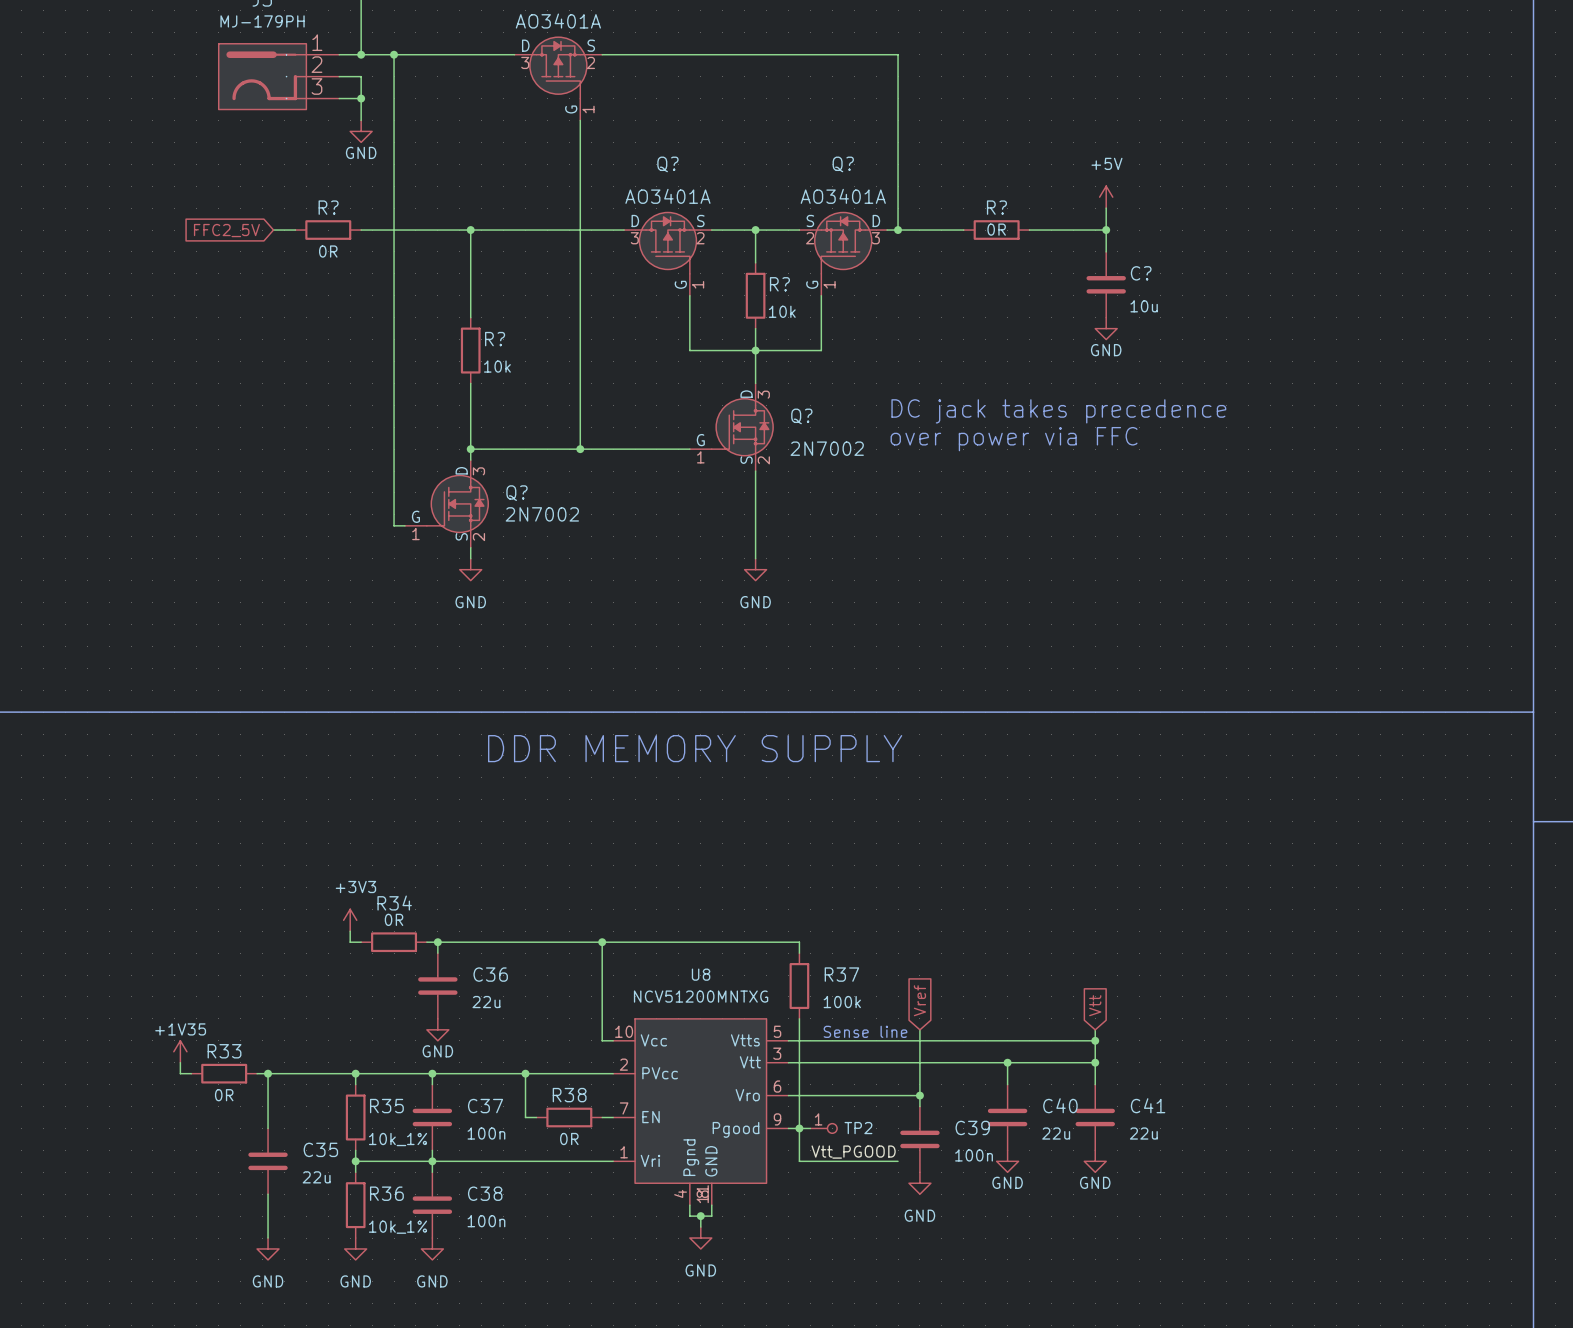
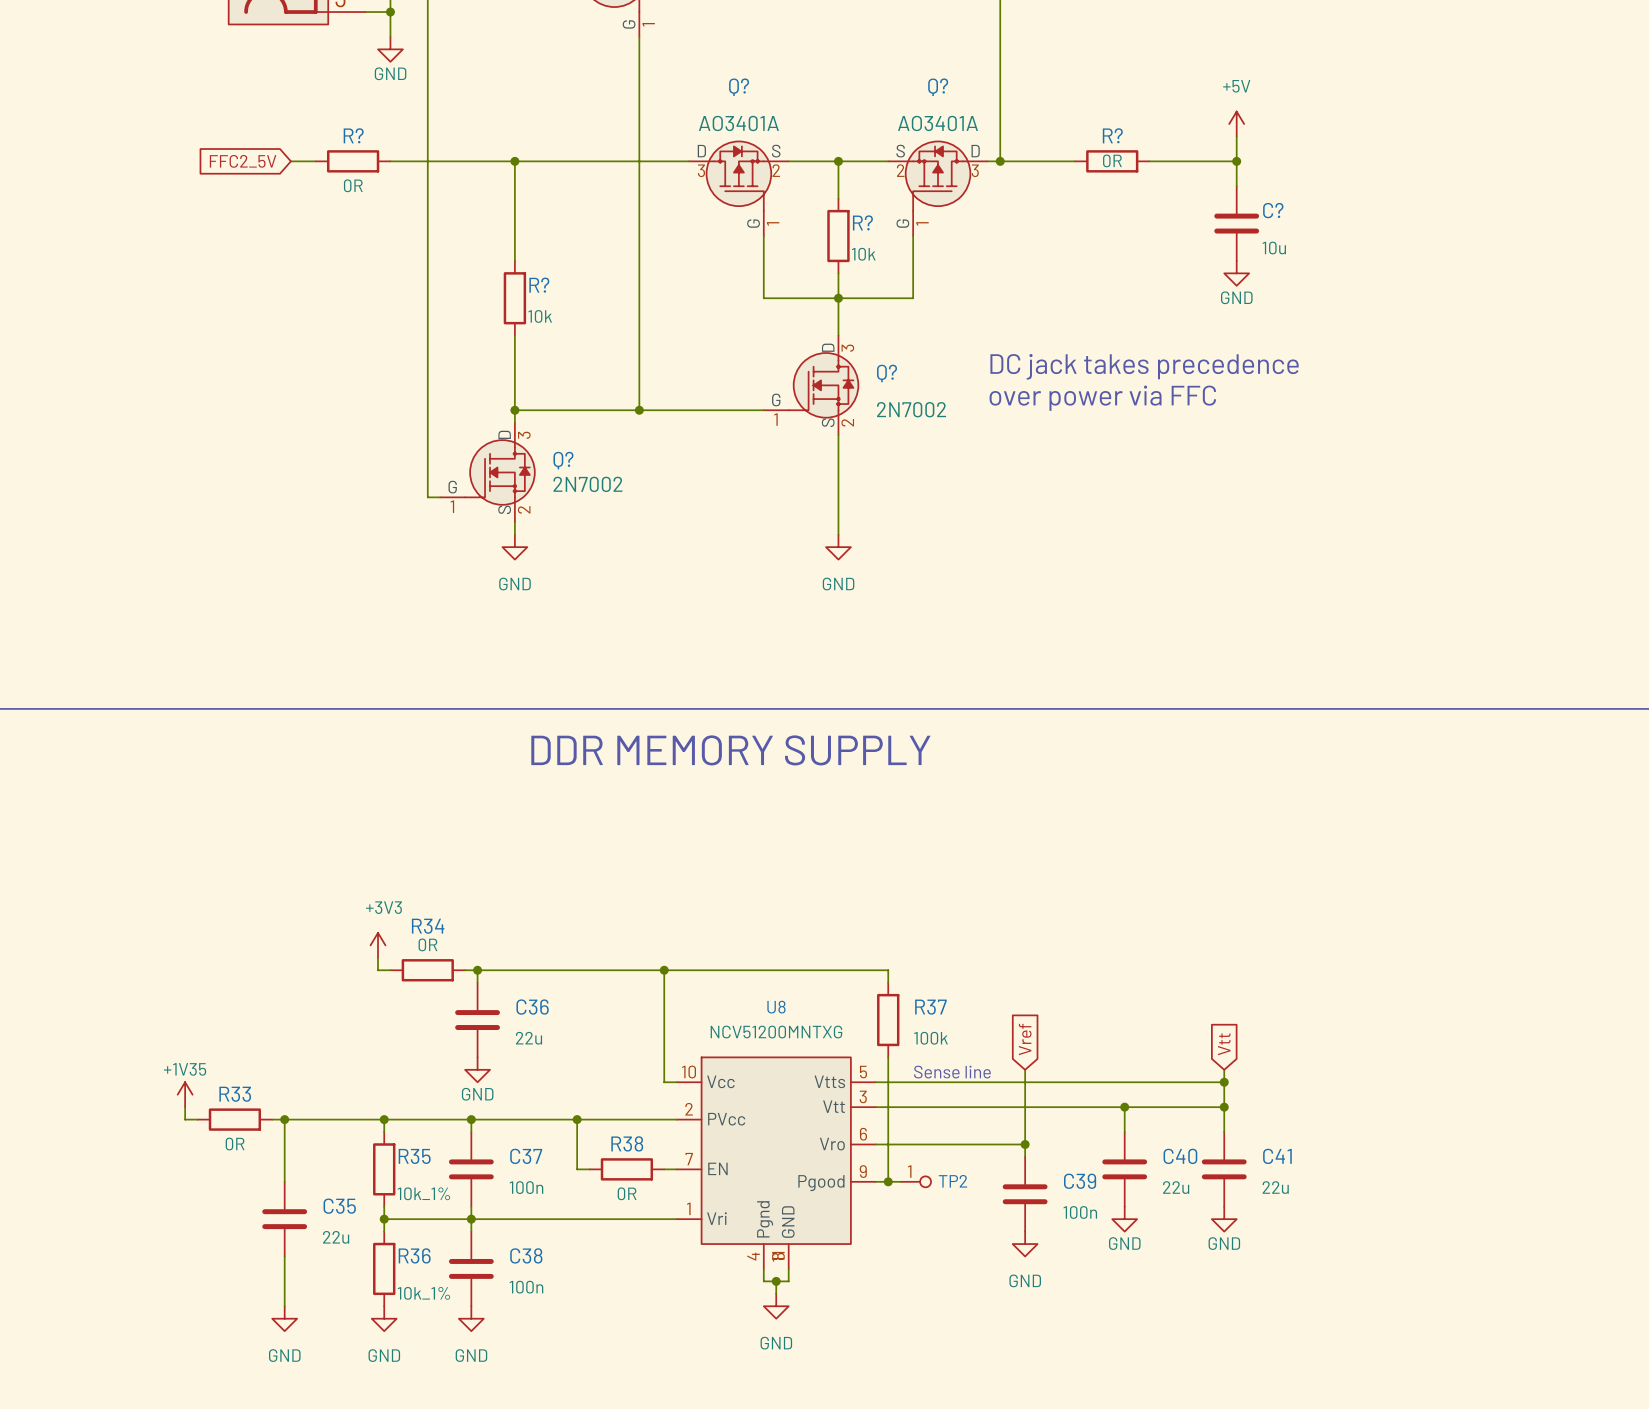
wire: (799, 1128) (799, 1161) (898, 1161) -> none
label: Vtt_PGOOD (853, 1152) -> none

